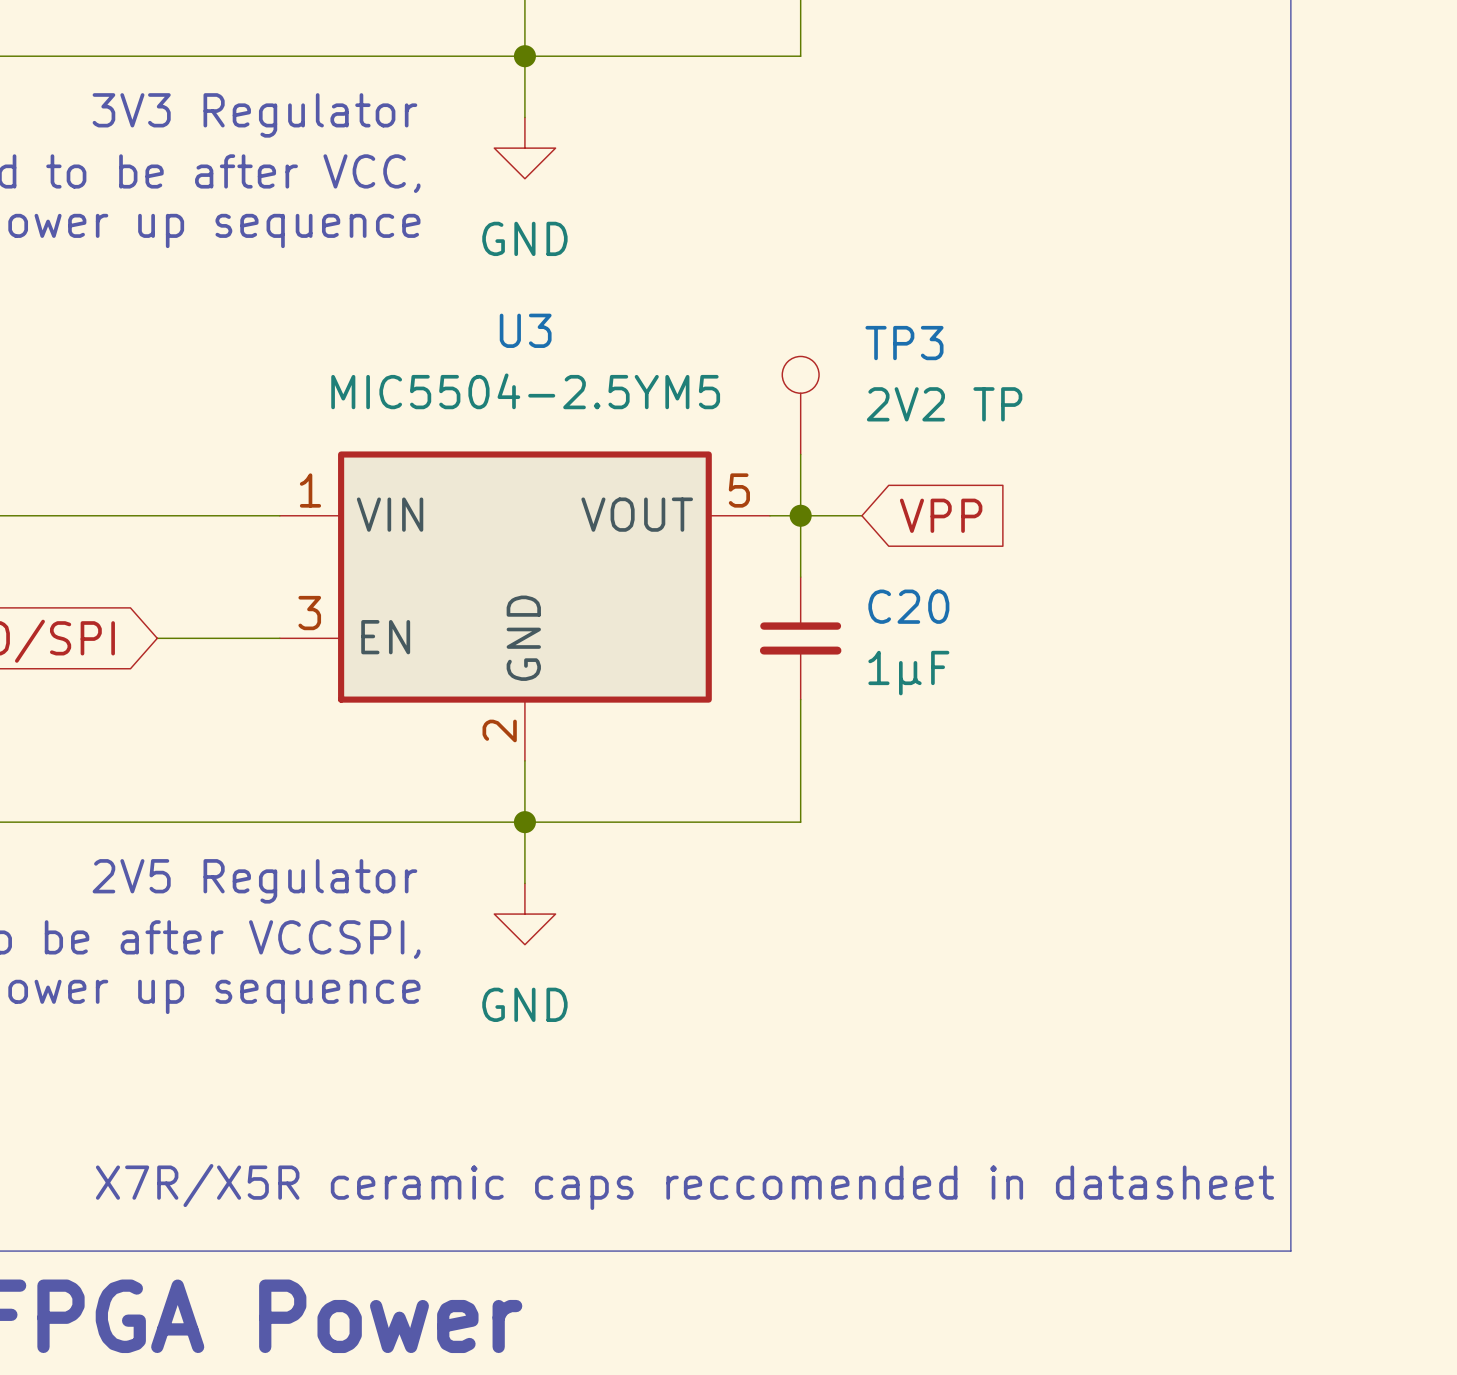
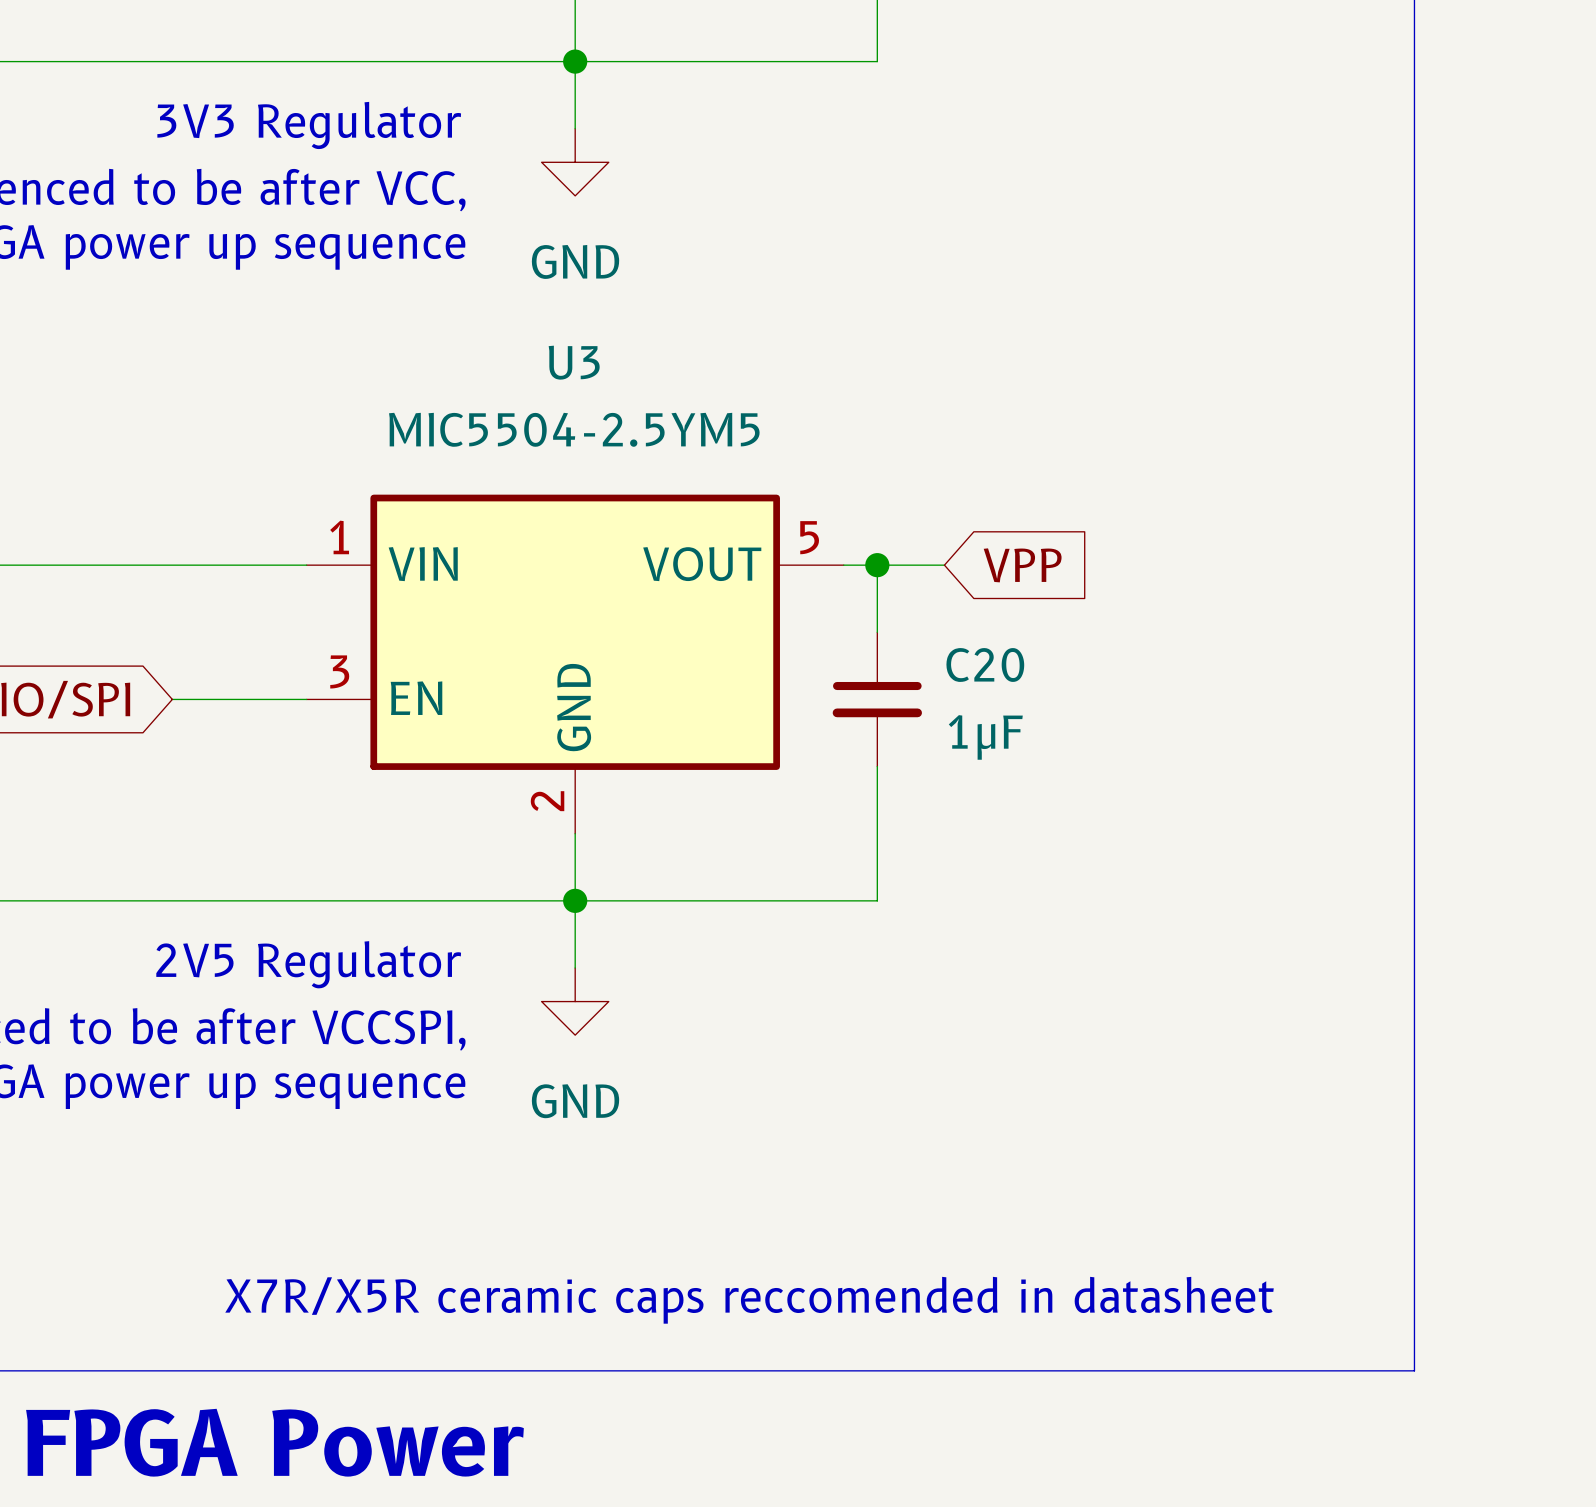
TP3: 2V2 TP (800, 405) -> none
wire: (800, 454) (800, 515) -> none

